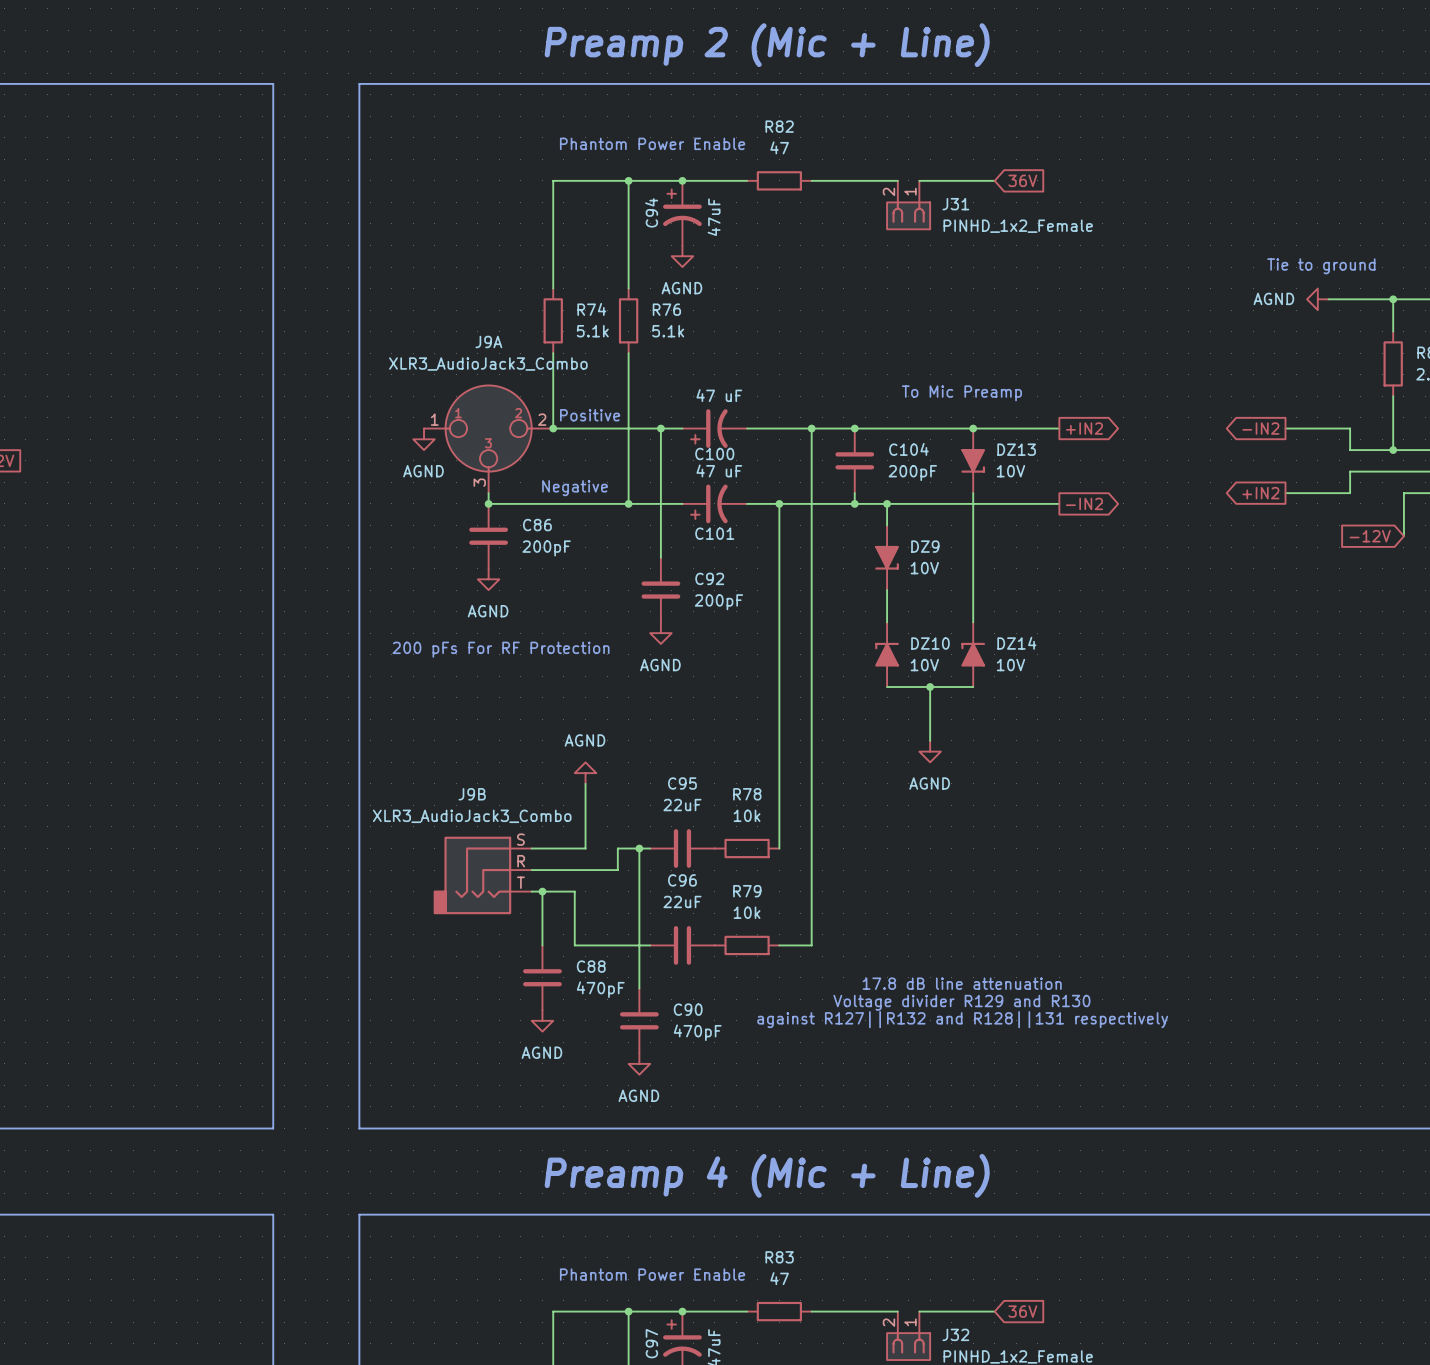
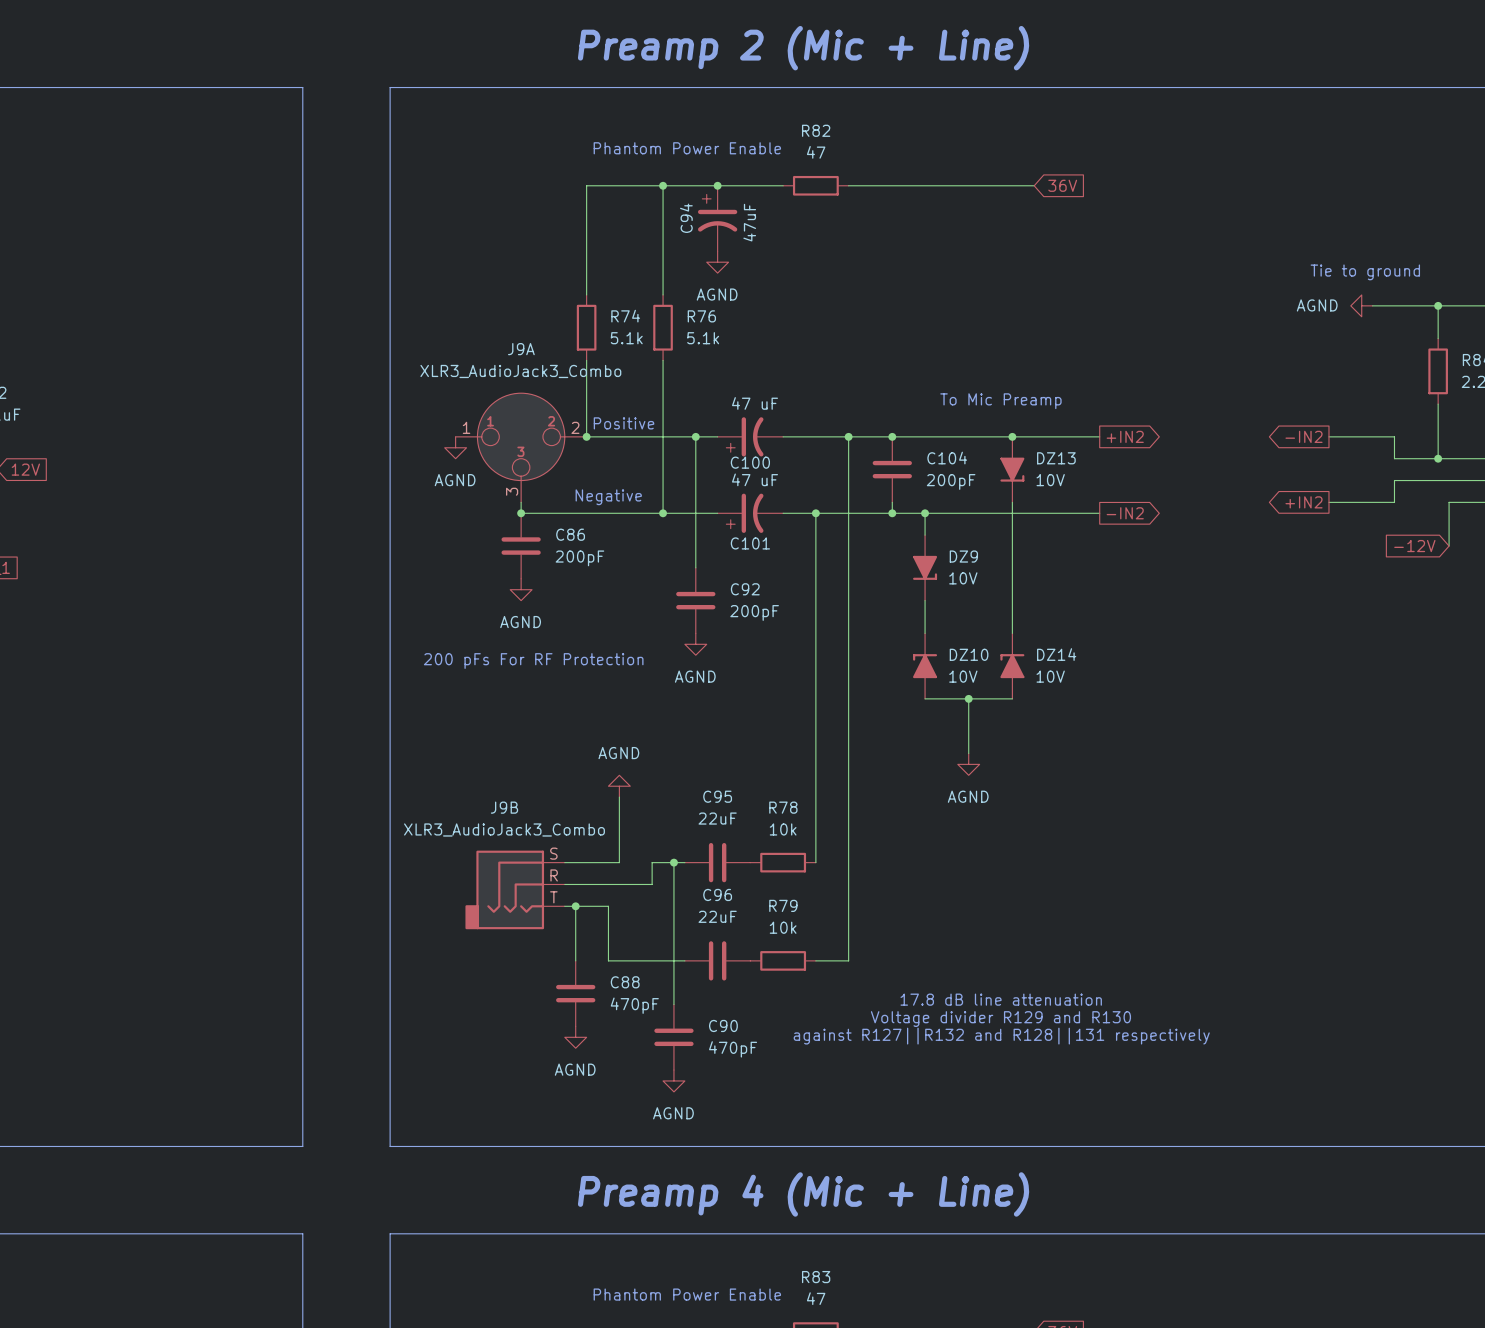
wire: none -> (935, 185) (957, 185)
J31: PINHD_1x2_Female (908, 205) -> none

